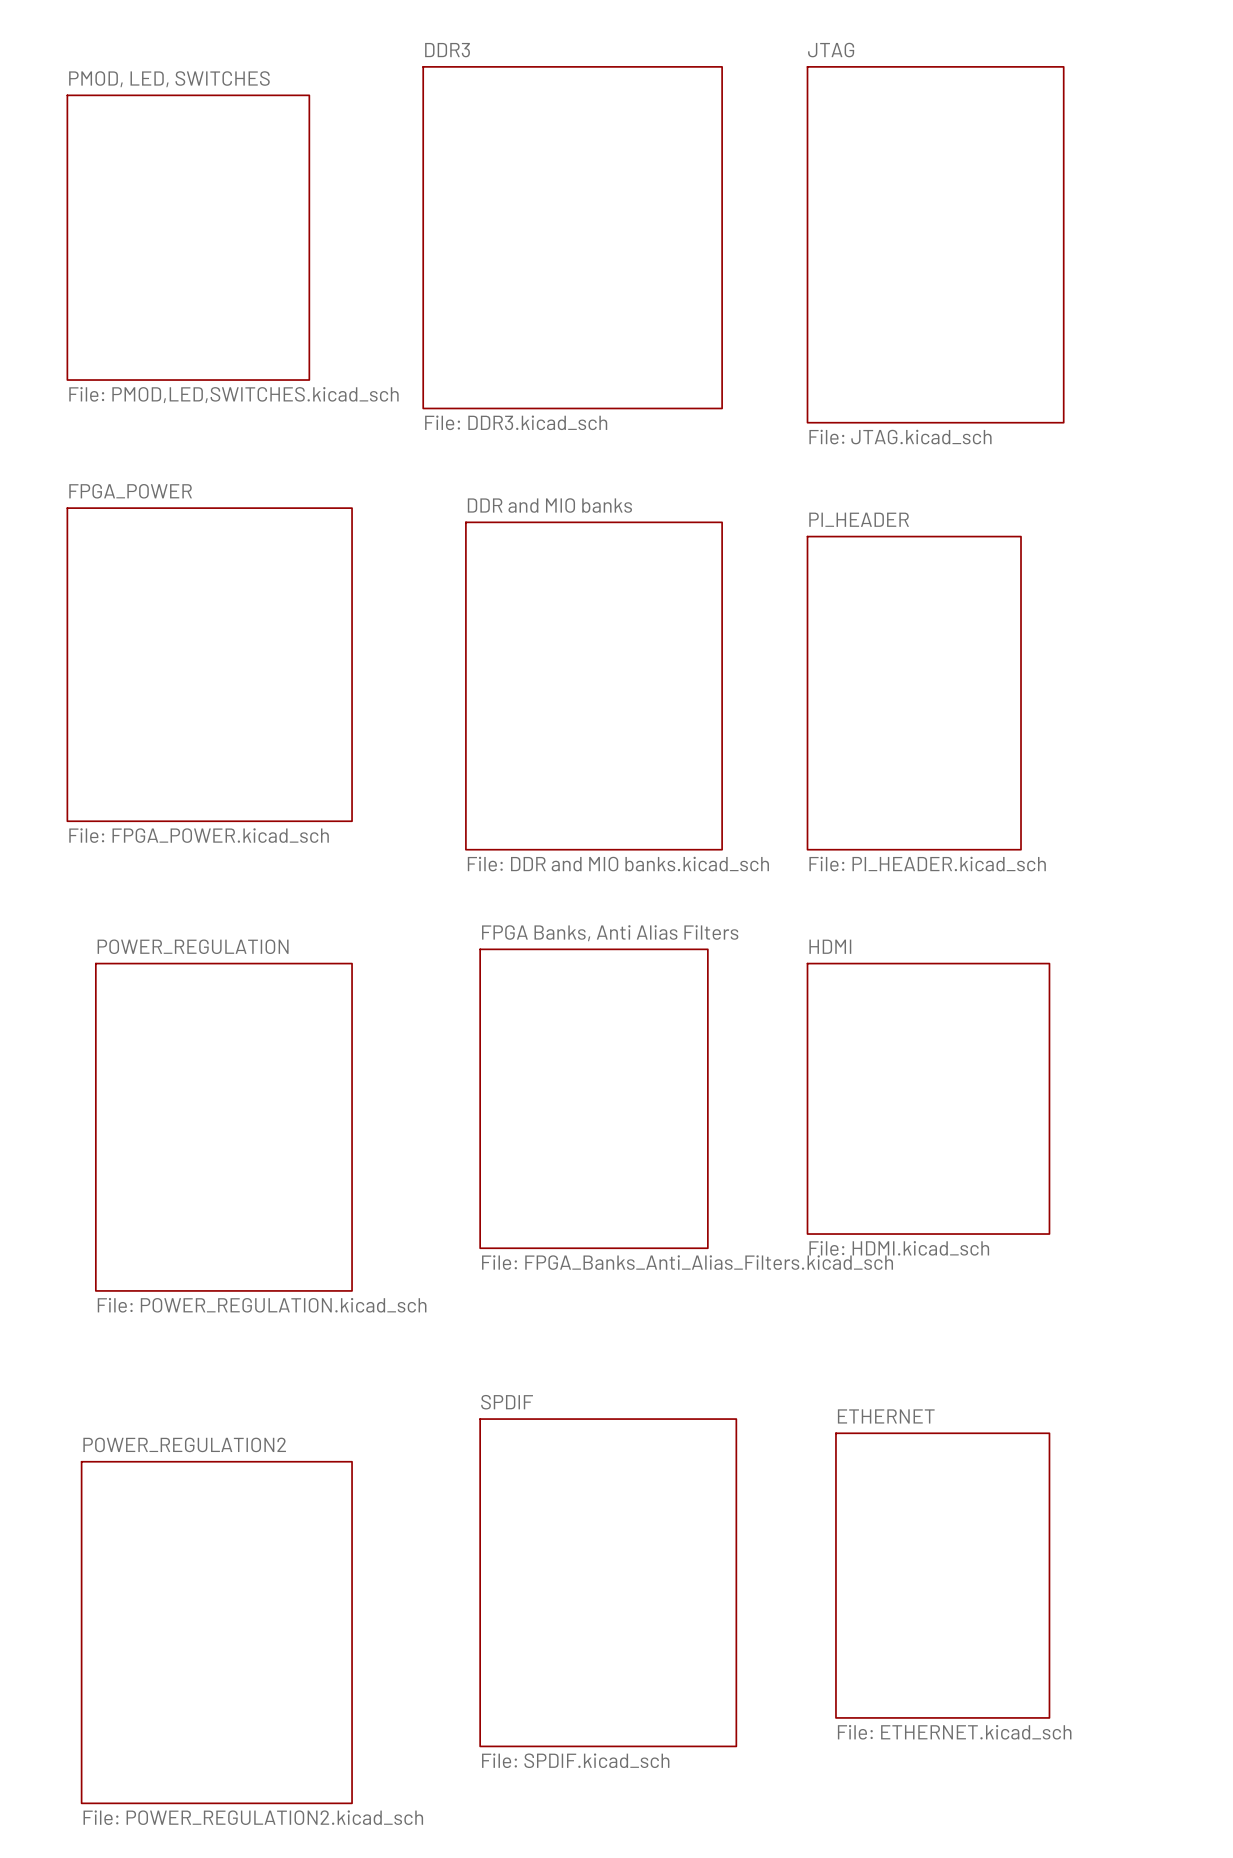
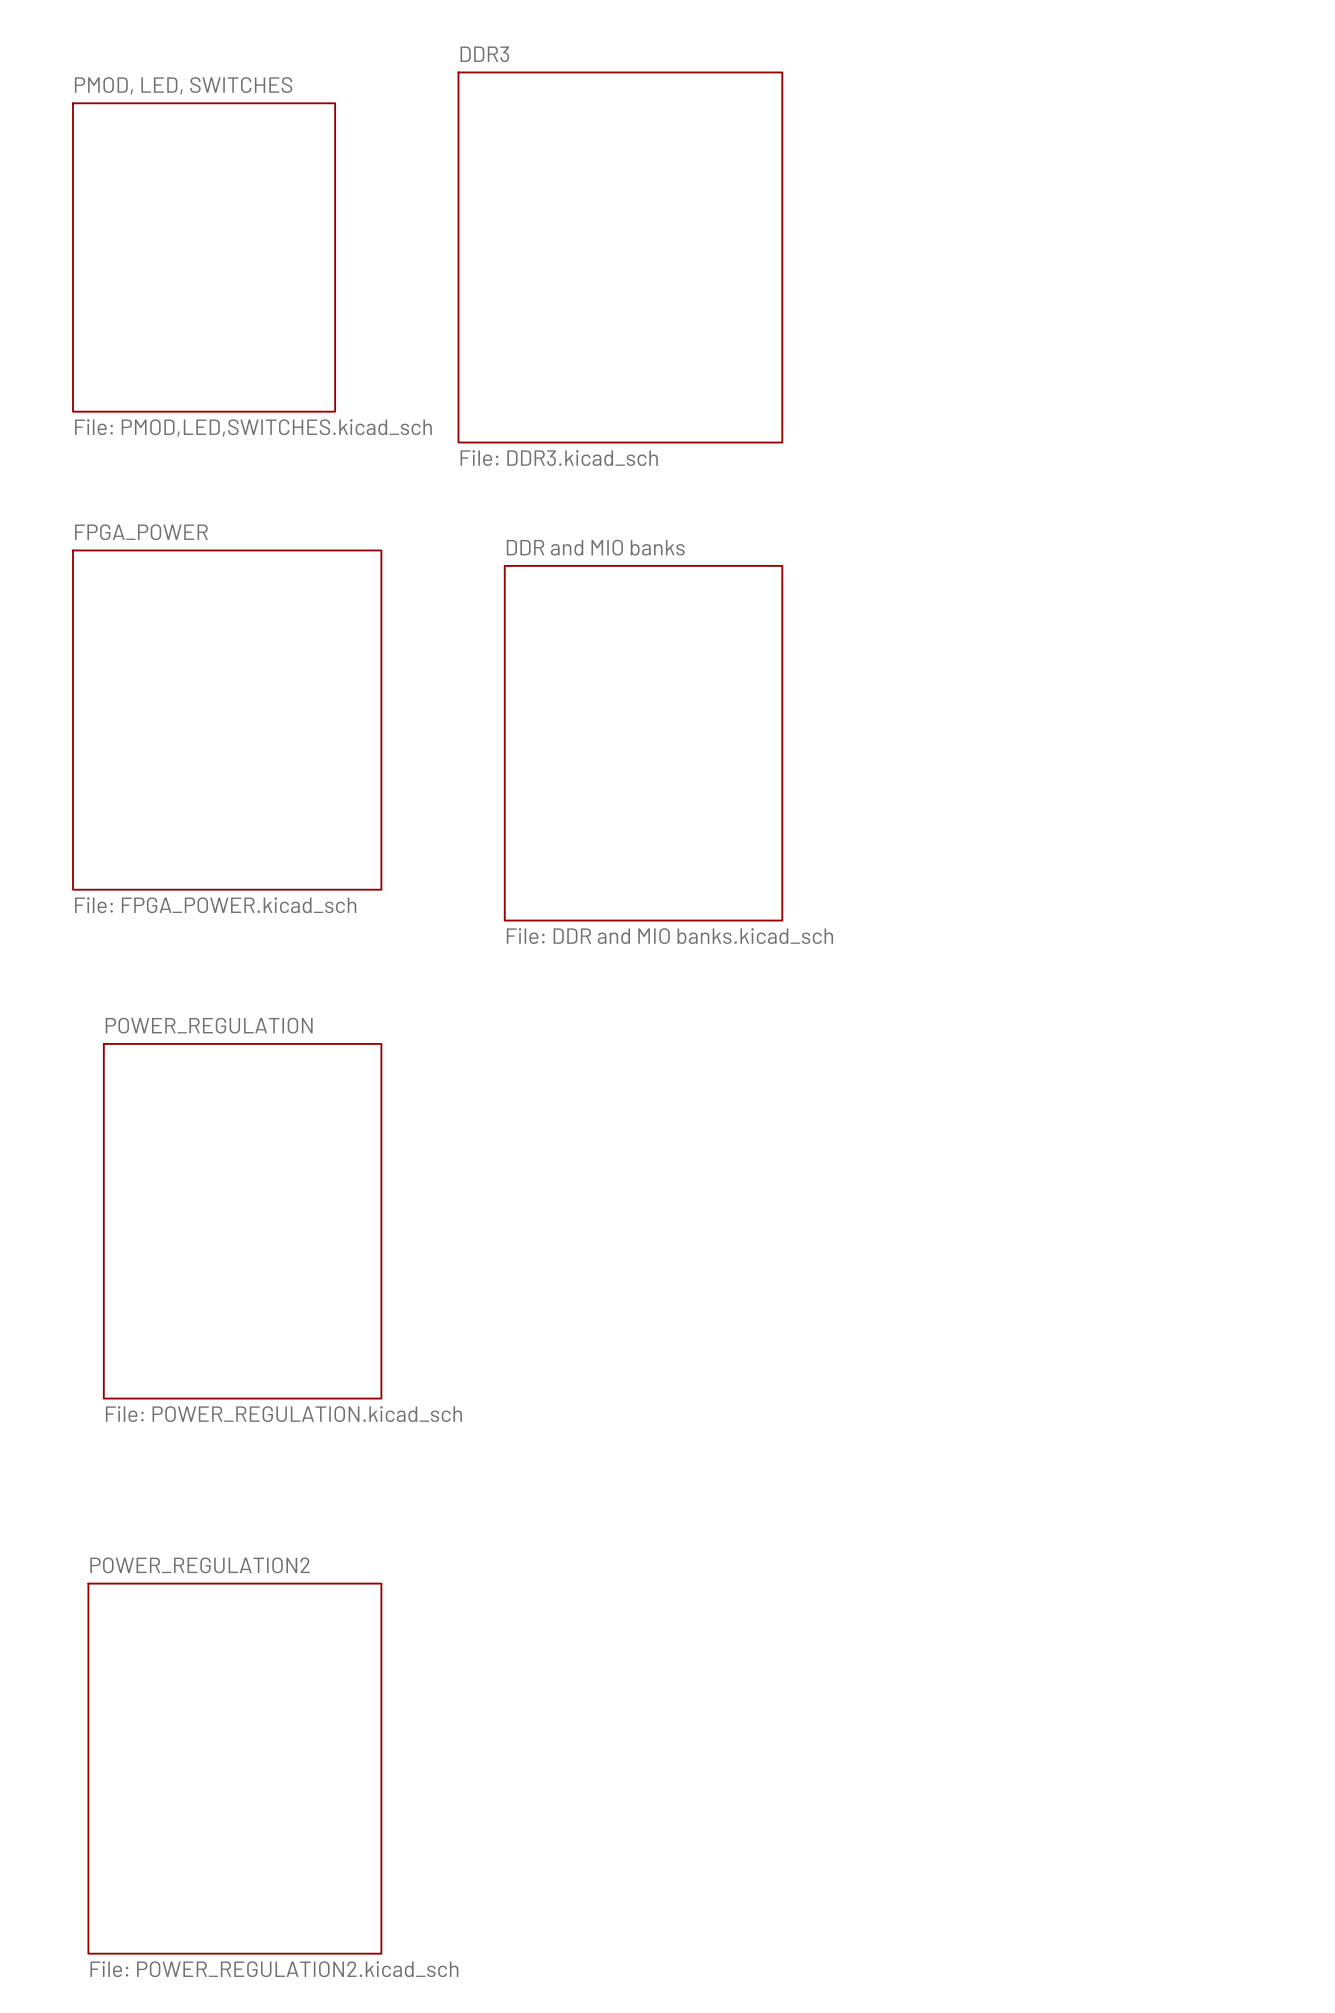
sheet JTAG: File: JTAG.kicad_sch (935, 244) -> none
sheet PI_HEADER: File: PI_HEADER.kicad_sch (914, 693) -> none
sheet FPGA Banks, Anti Alias Filters: File: FPGA_Banks_Anti_Alias_Filters.kicad_sch (594, 1098) -> none
sheet HDMI: File: HDMI.kicad_sch (928, 1098) -> none
sheet ETHERNET: File: ETHERNET.kicad_sch (942, 1575) -> none
sheet SPDIF: File: SPDIF.kicad_sch (608, 1582) -> none

